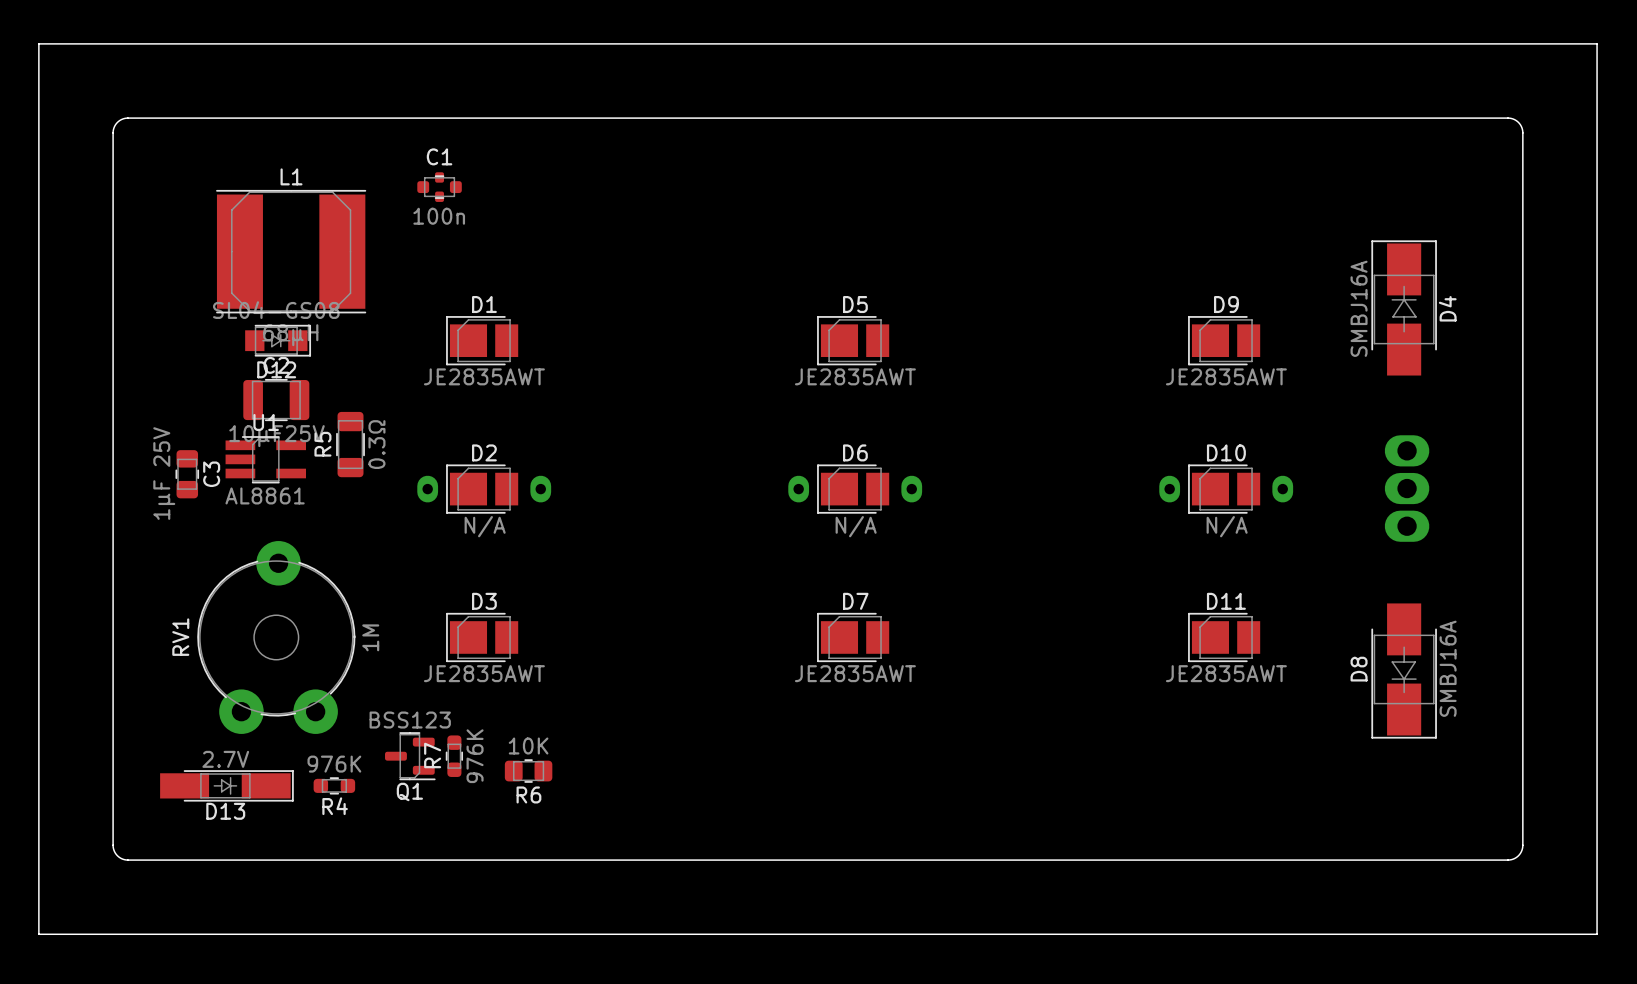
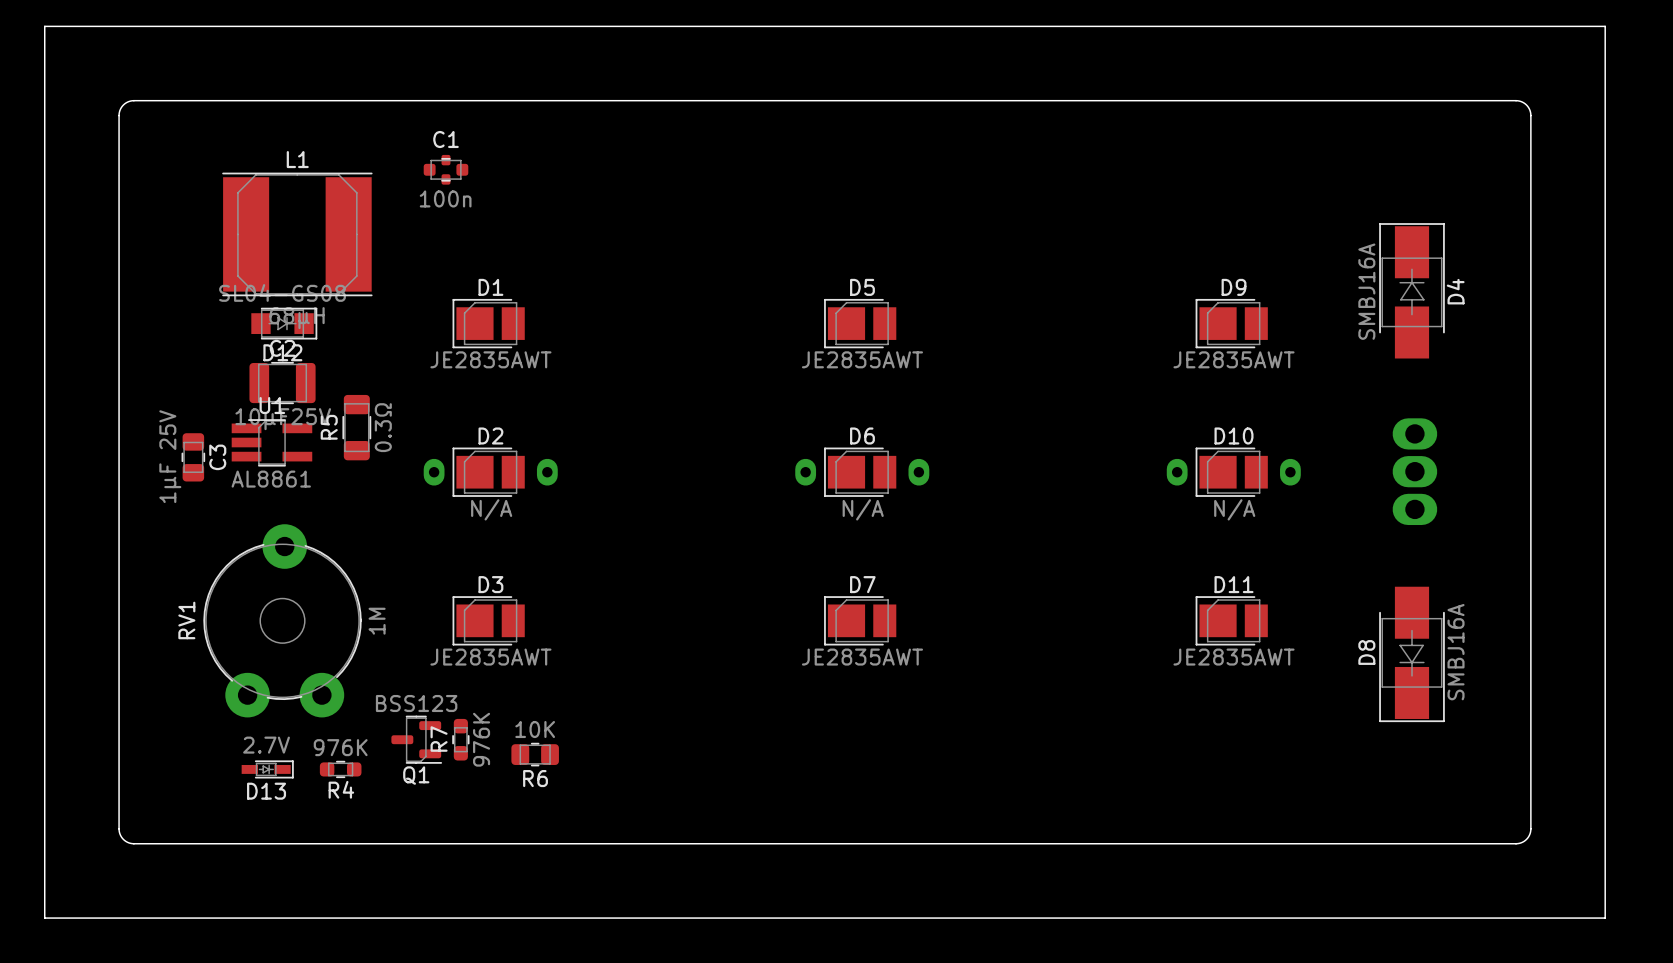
D13 footprint: [160, 770, 294, 802] -> [241, 760, 294, 779]

